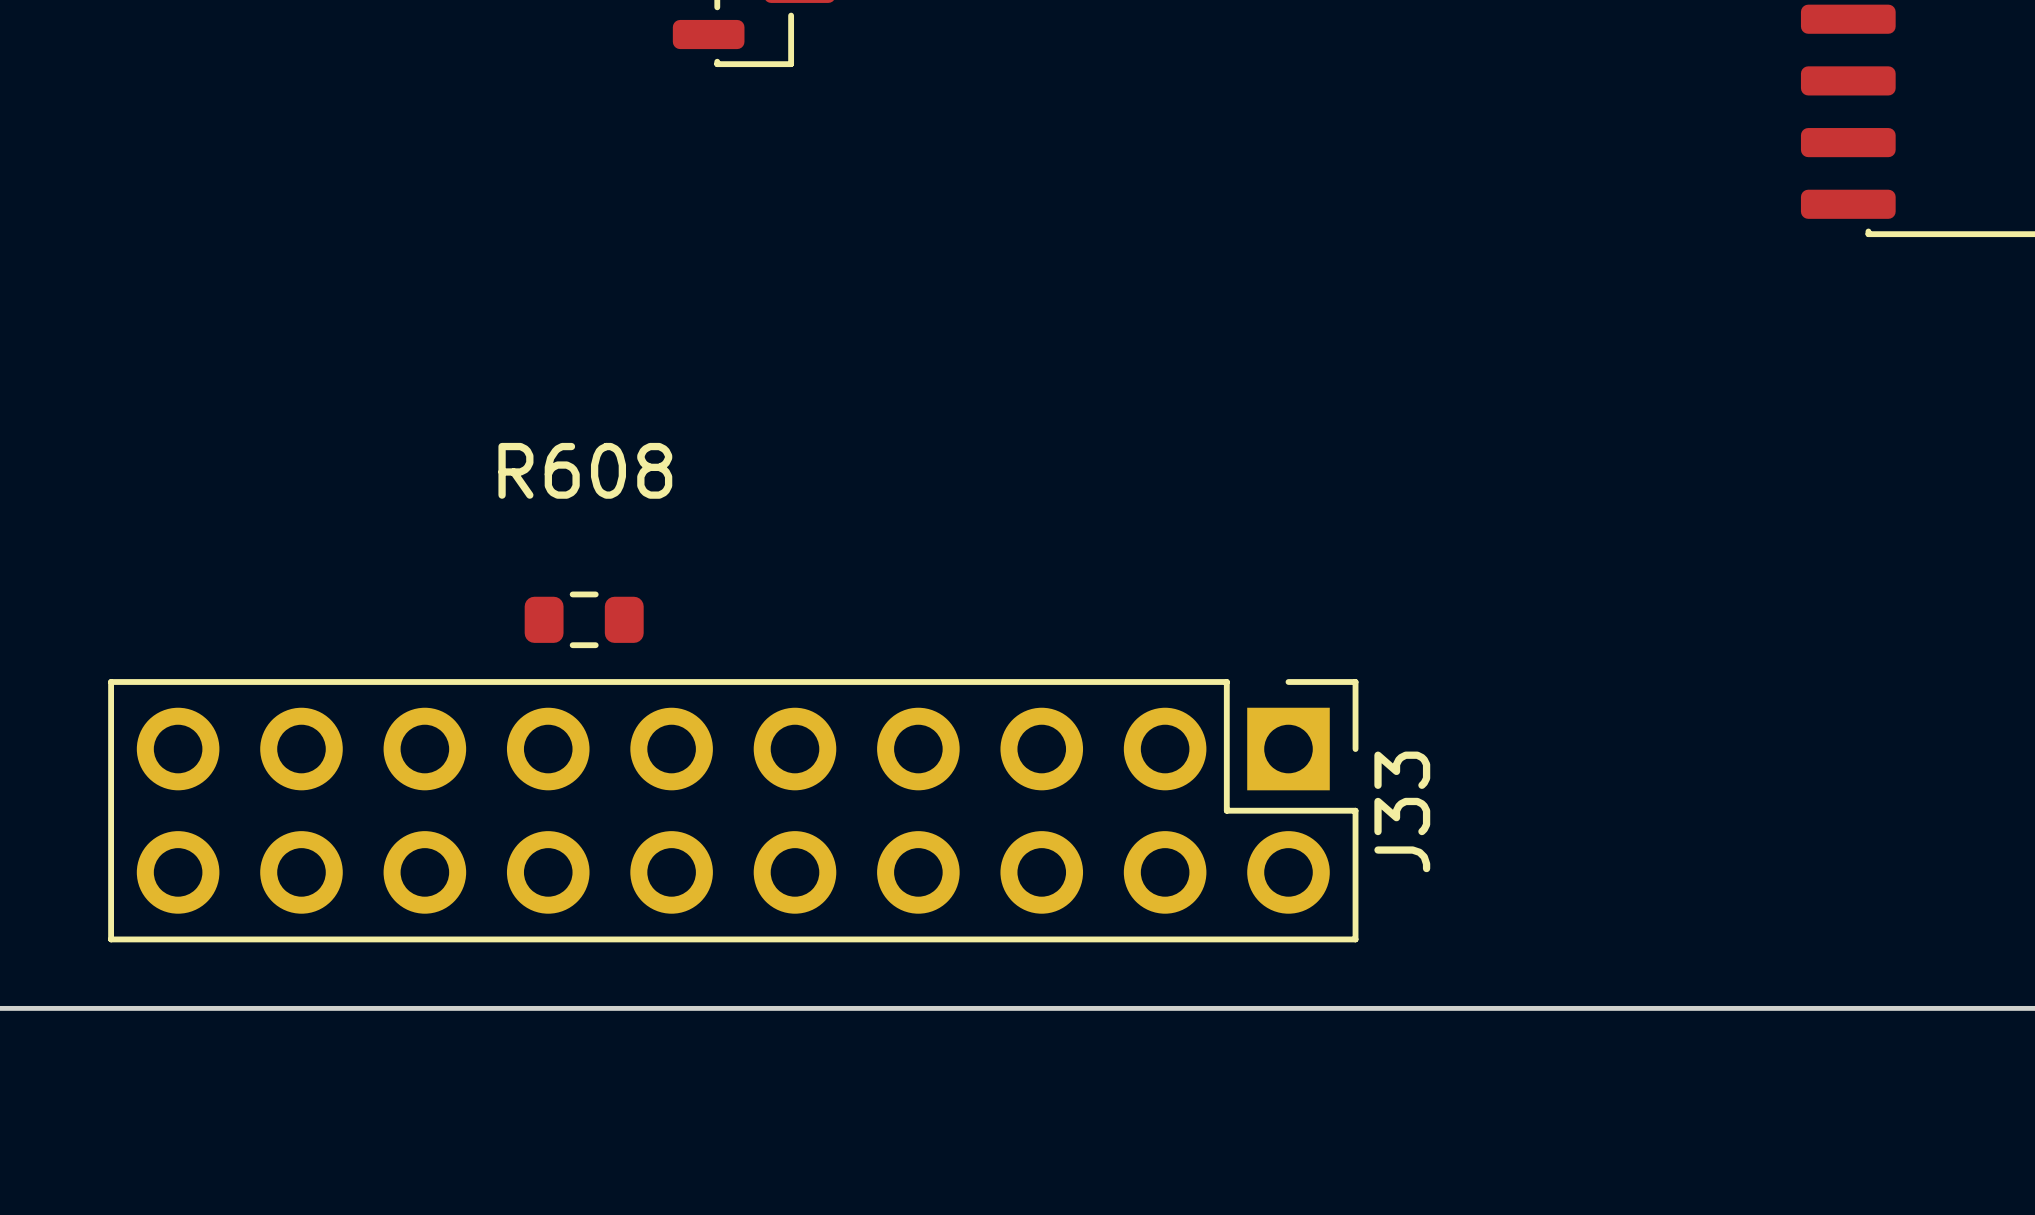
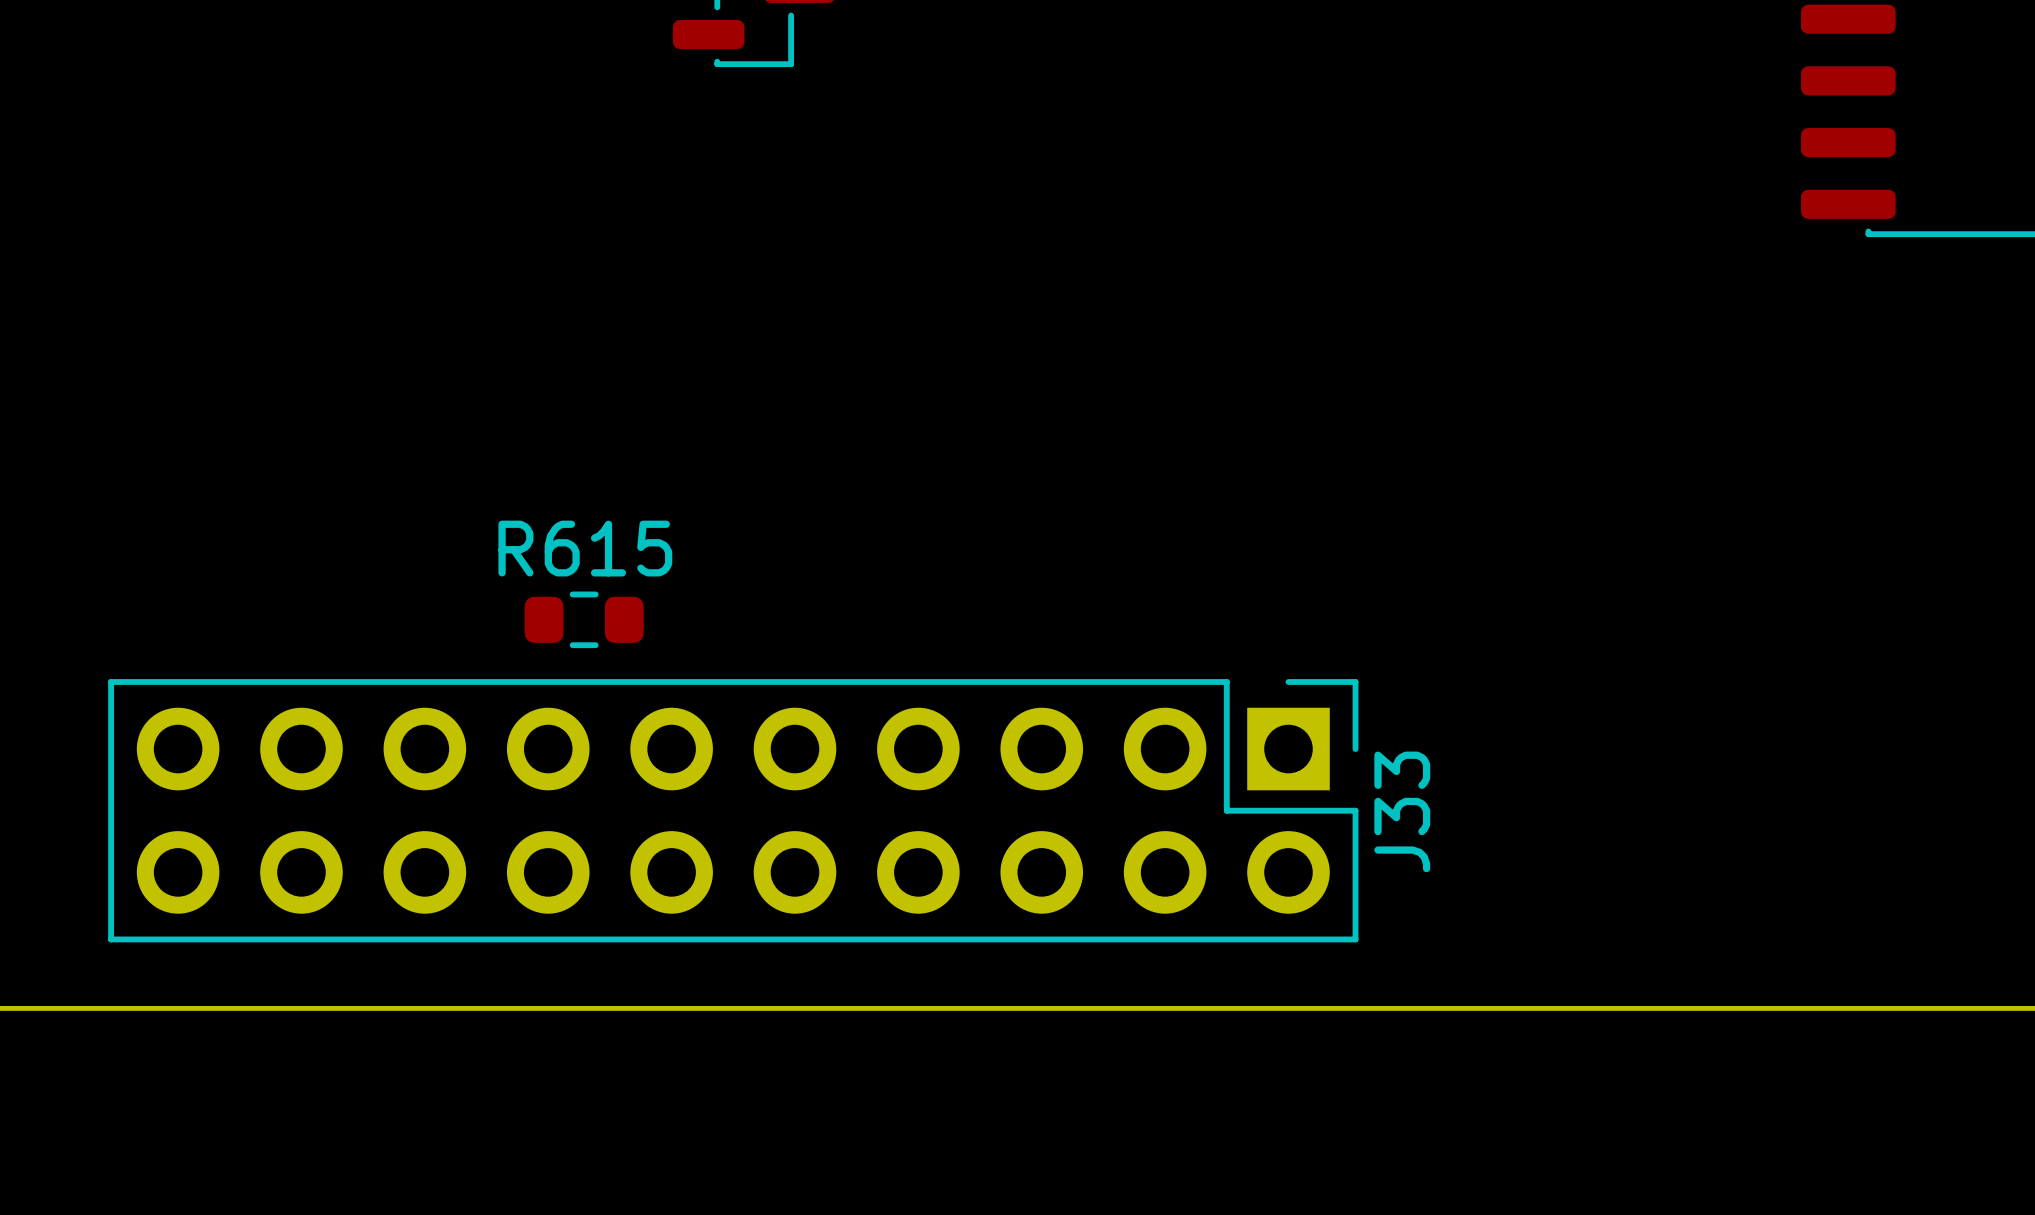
R608 name: R608 (585, 470) -> R615 (585, 548)

